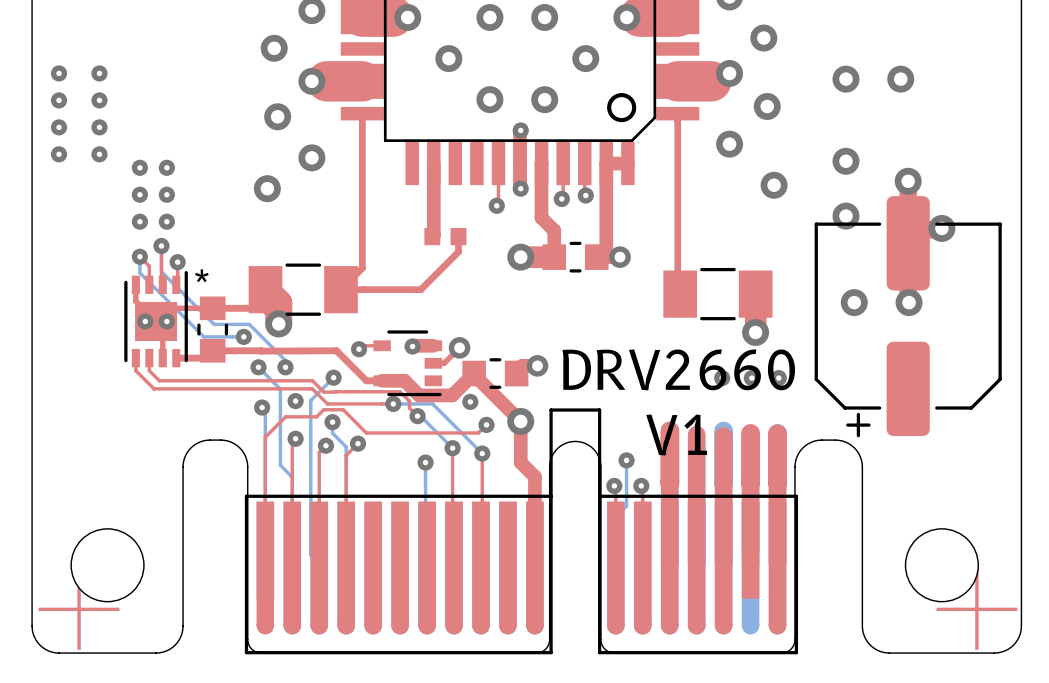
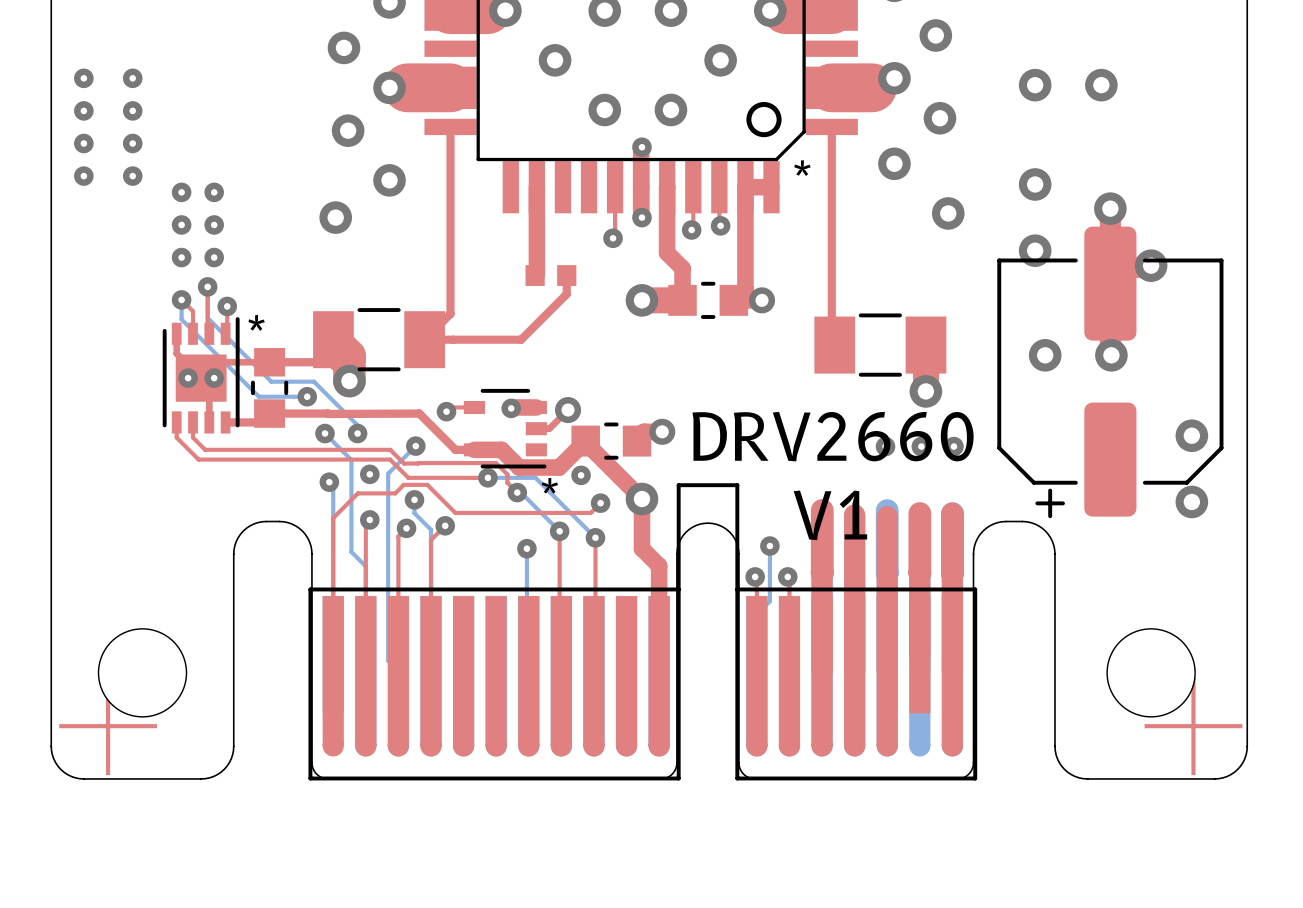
text: none -> * (802, 168)
via: none -> (1191, 435)
text: none -> * (549, 485)
via: none -> (1191, 501)

